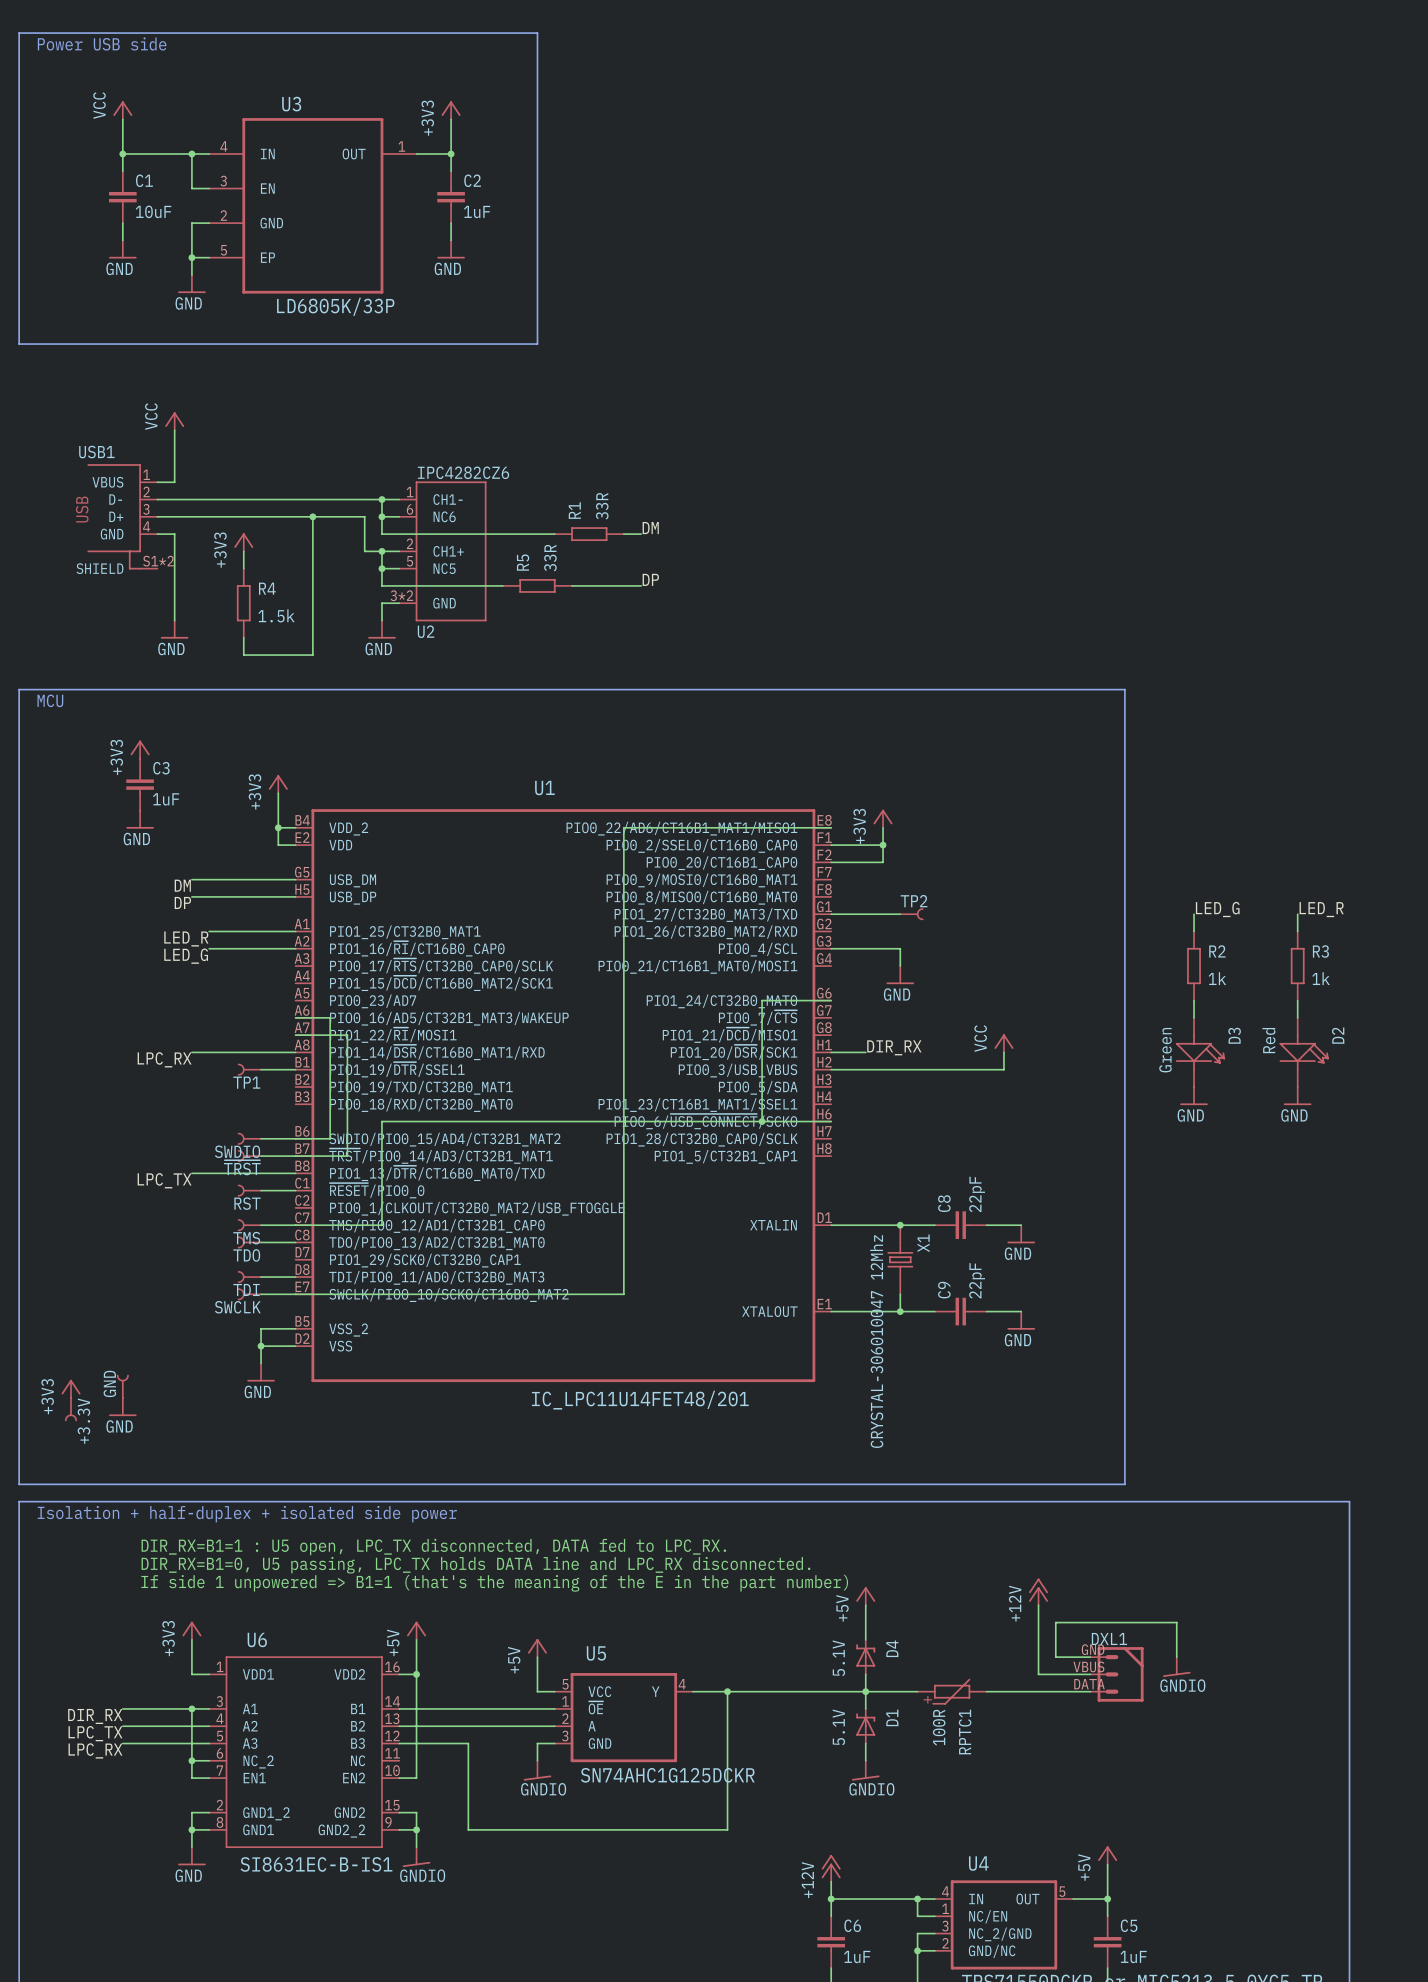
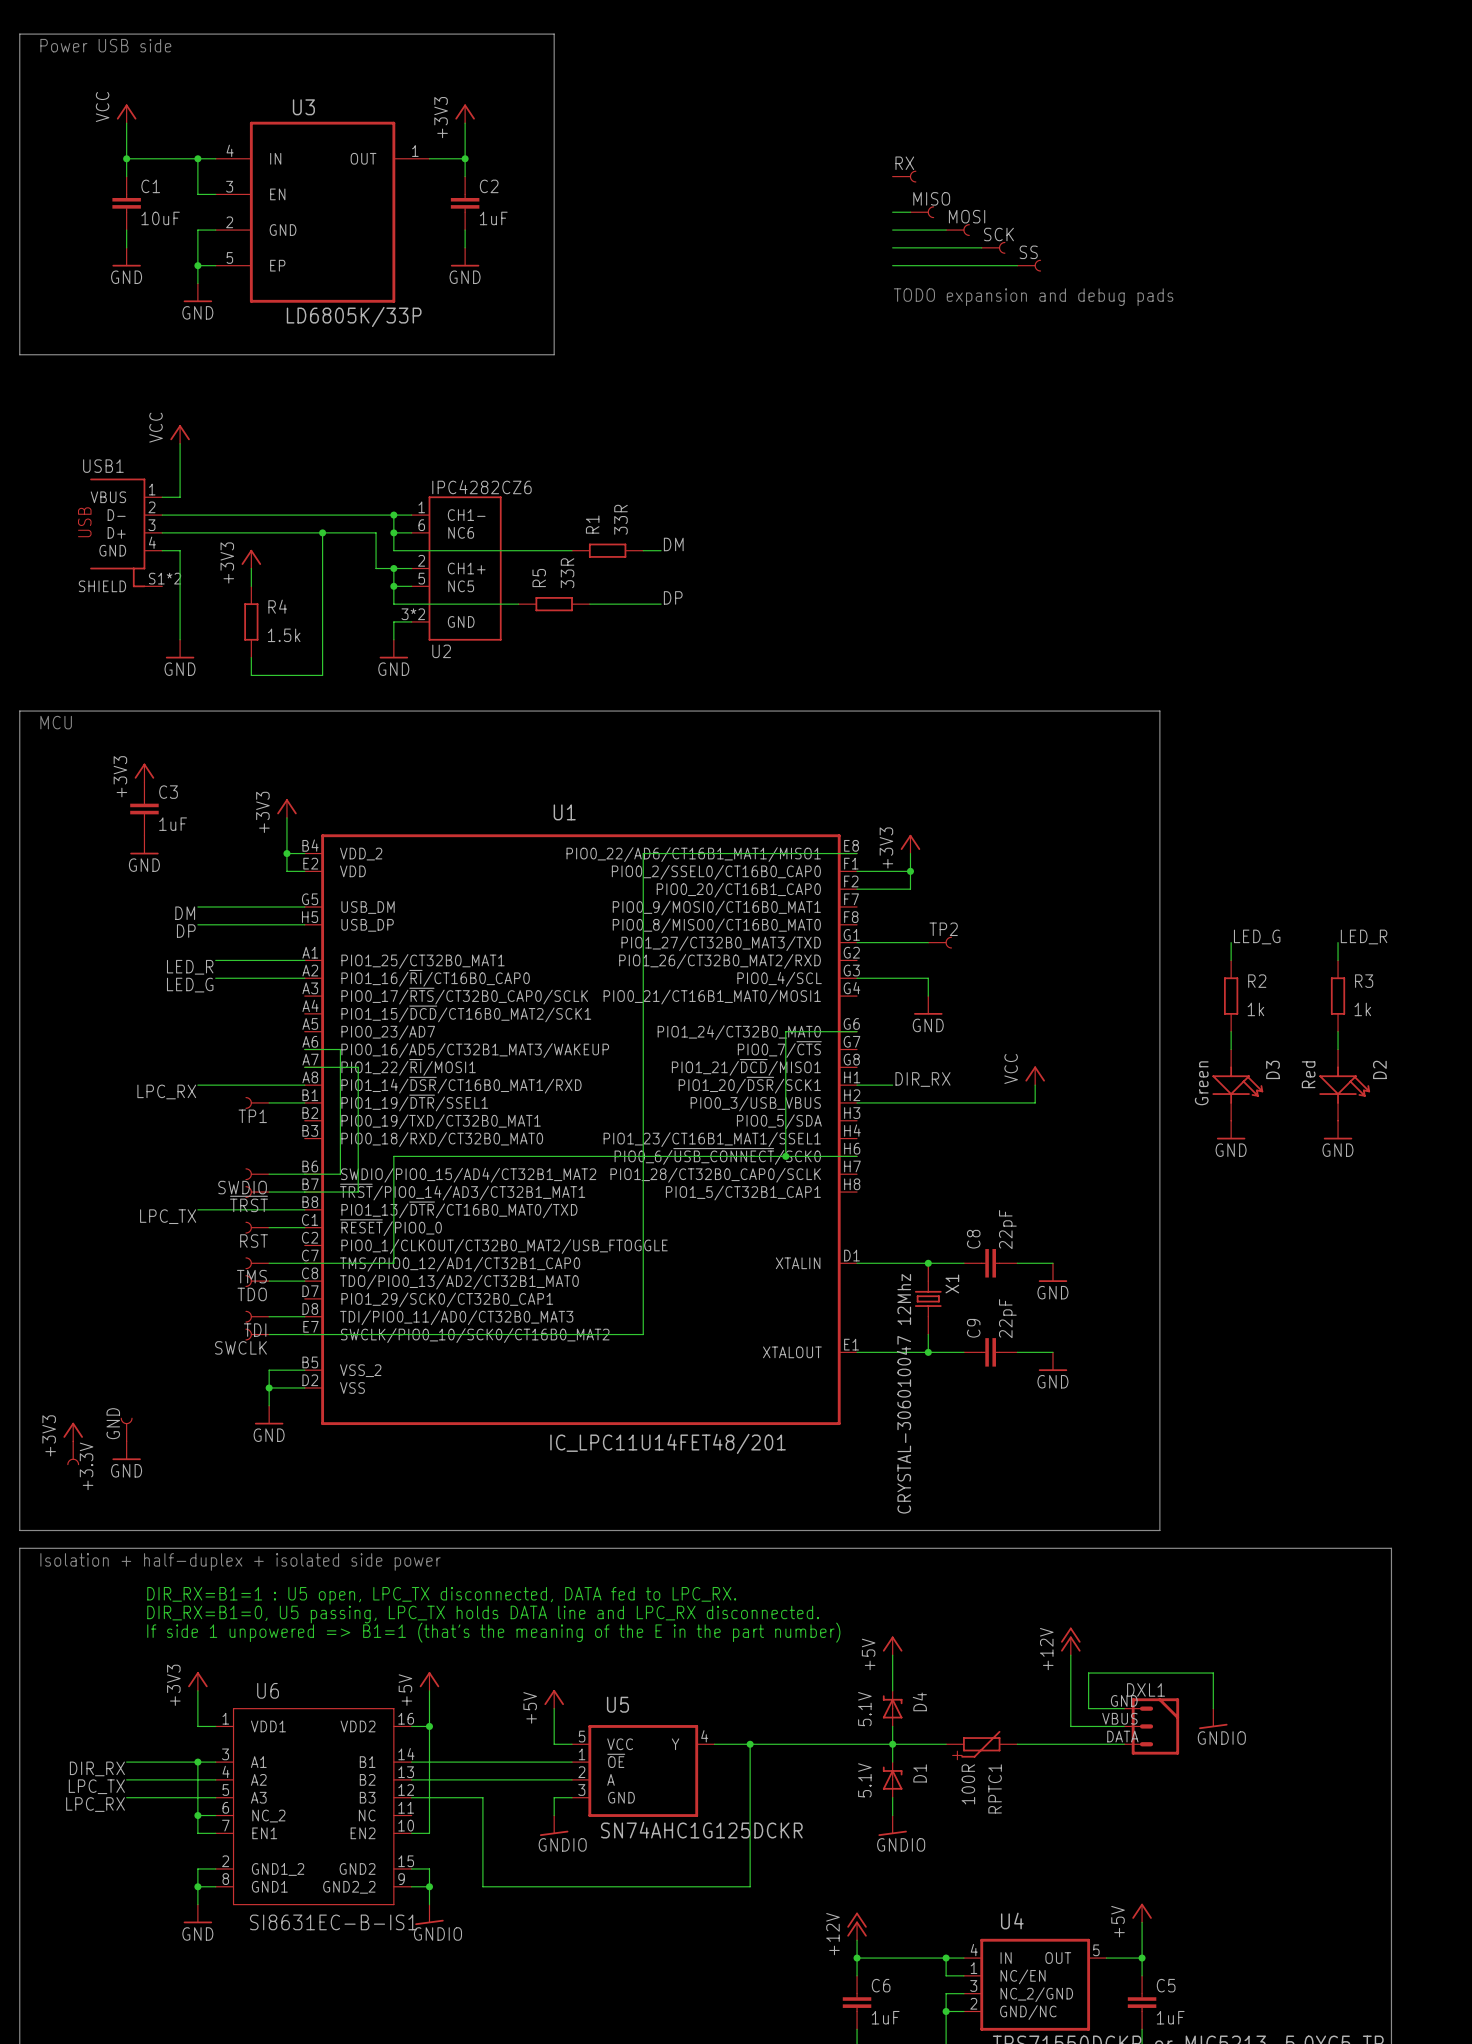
RX: none -> (904, 176)
wire: none -> (892, 212) (910, 212)
MISO: none -> (922, 212)
wire: none -> (892, 230) (946, 230)
MOSI: none -> (957, 230)
wire: none -> (892, 247) (981, 247)
SCK: none -> (993, 247)
wire: none -> (892, 265) (1017, 265)
SS: none -> (1029, 265)
text: none -> TODO expansion and debug pads (1033, 297)

